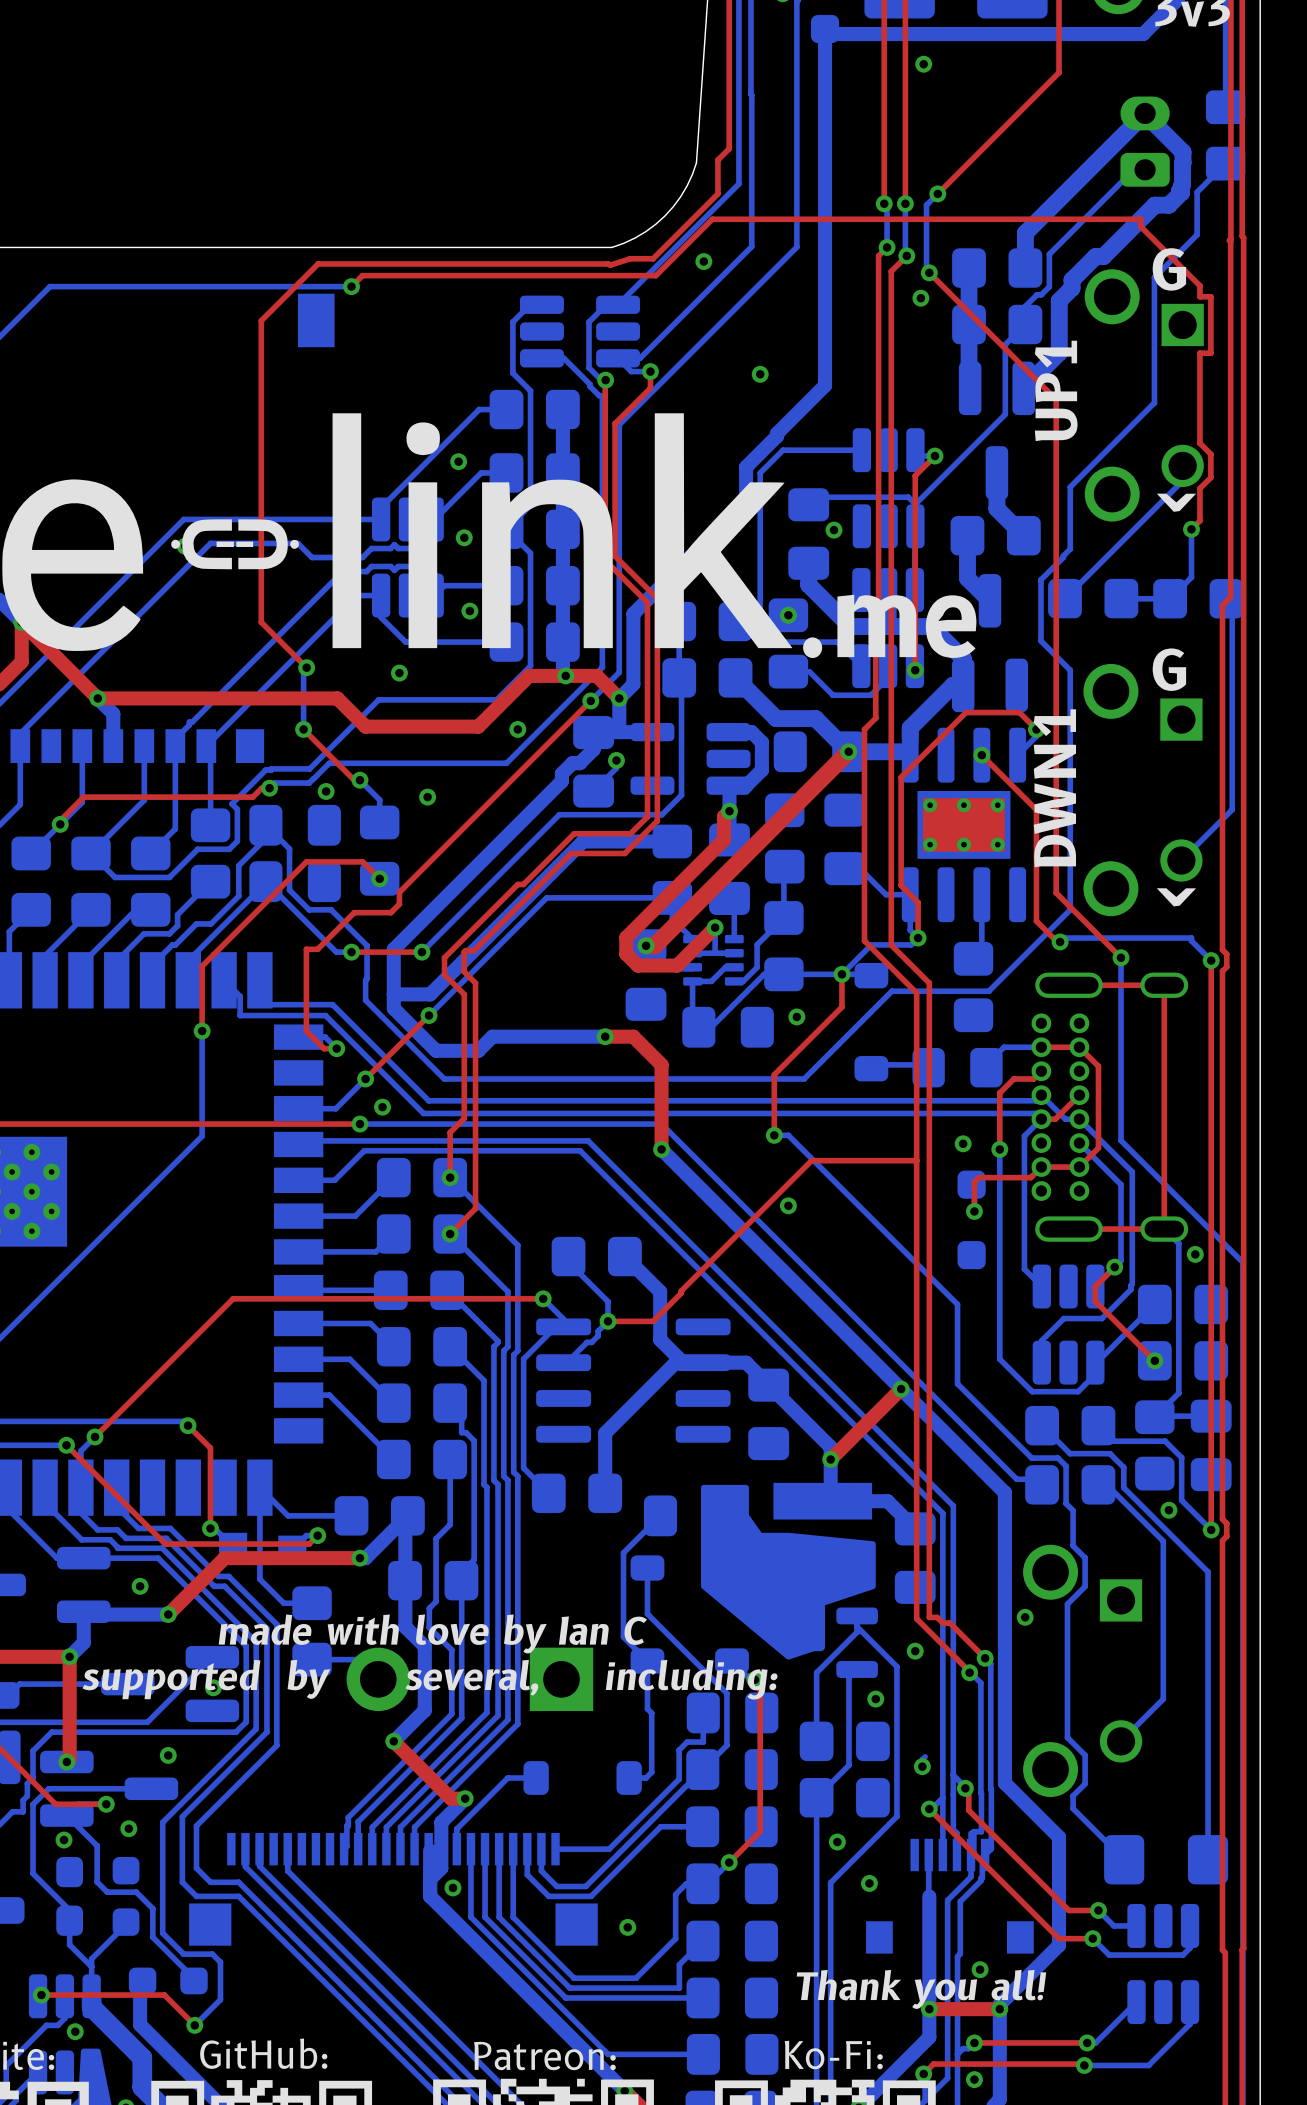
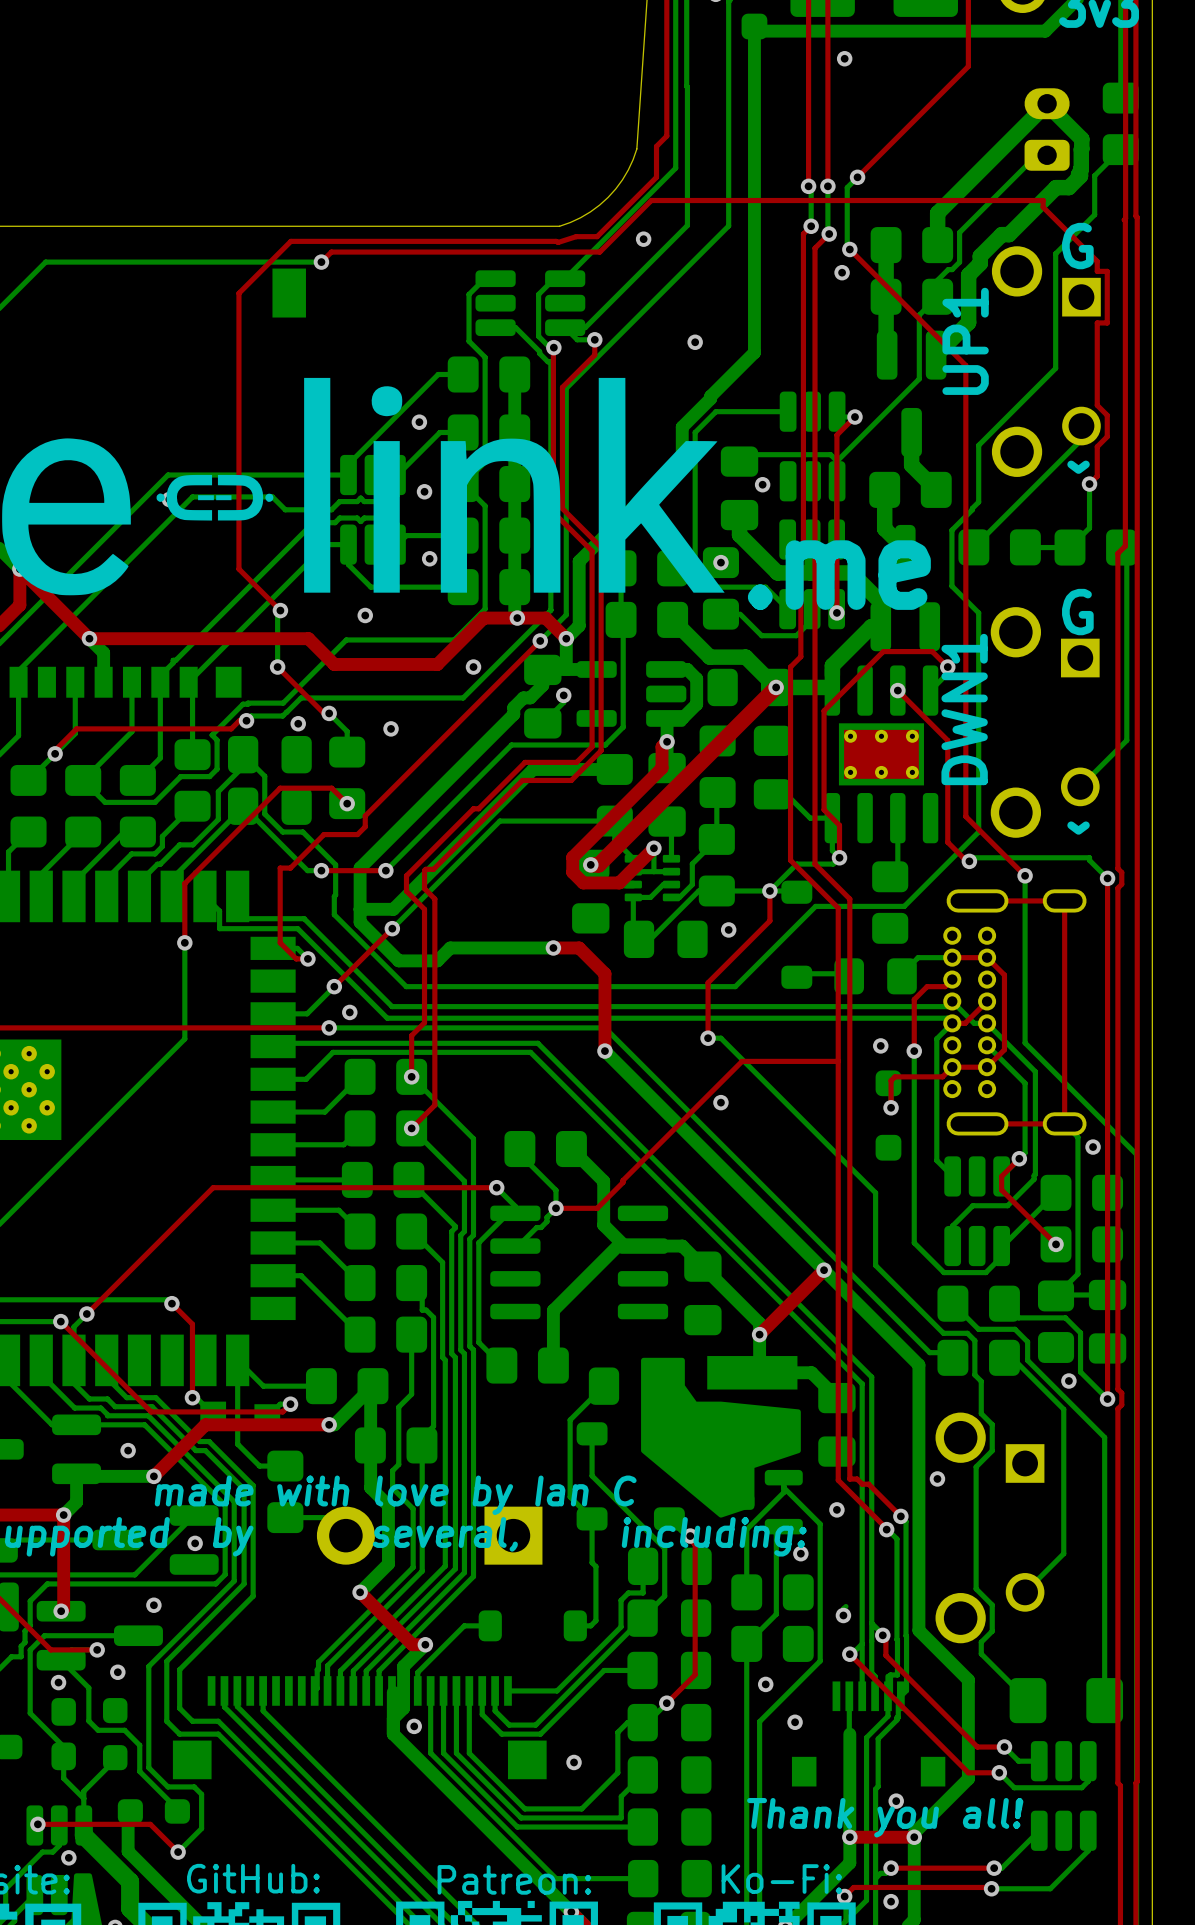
text position: Thank you all! (921, 1989) -> Thank you all! (885, 1817)

